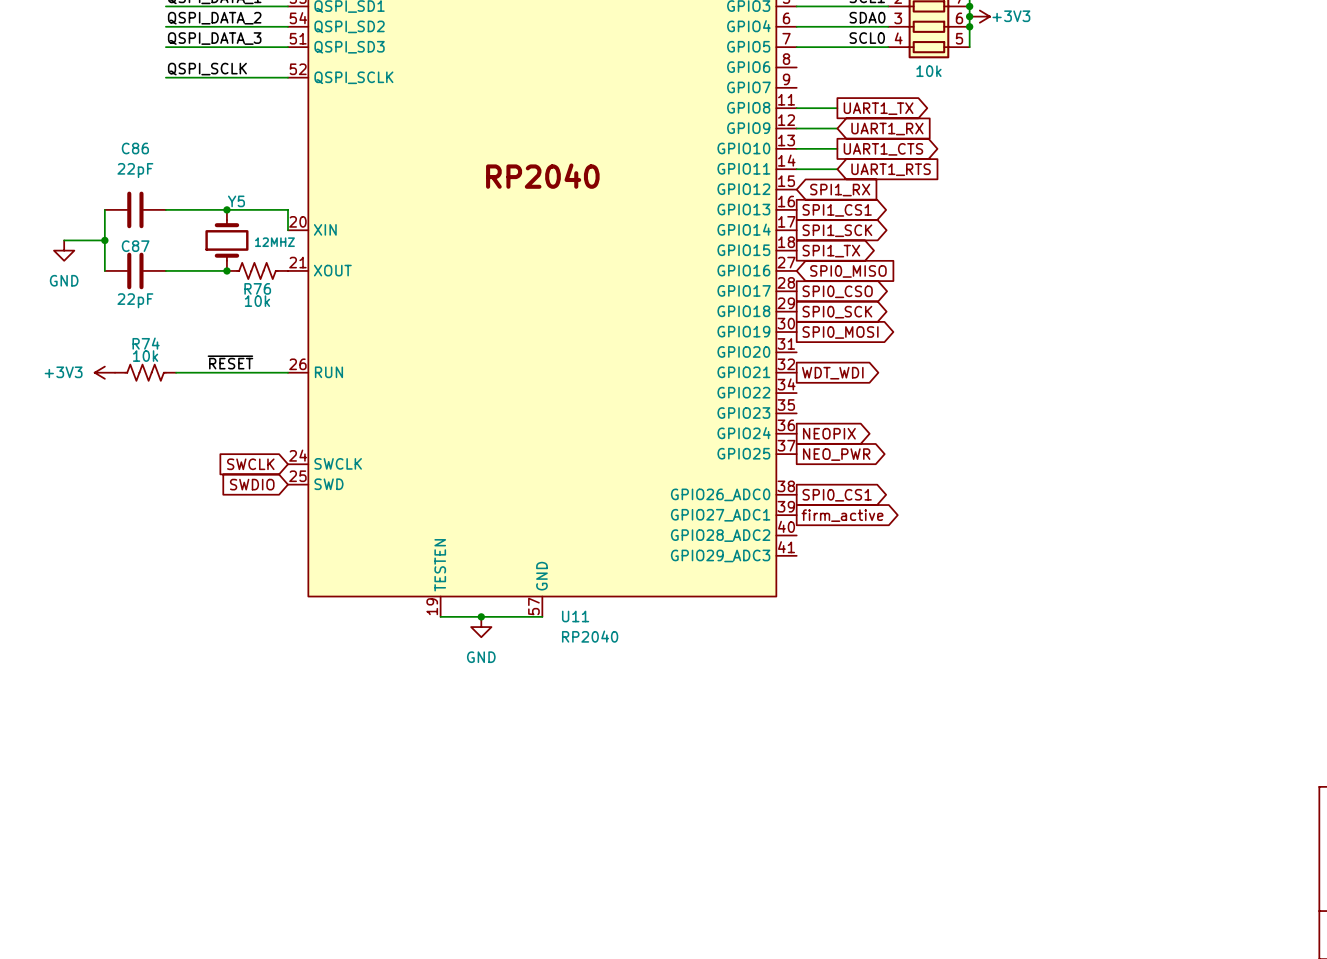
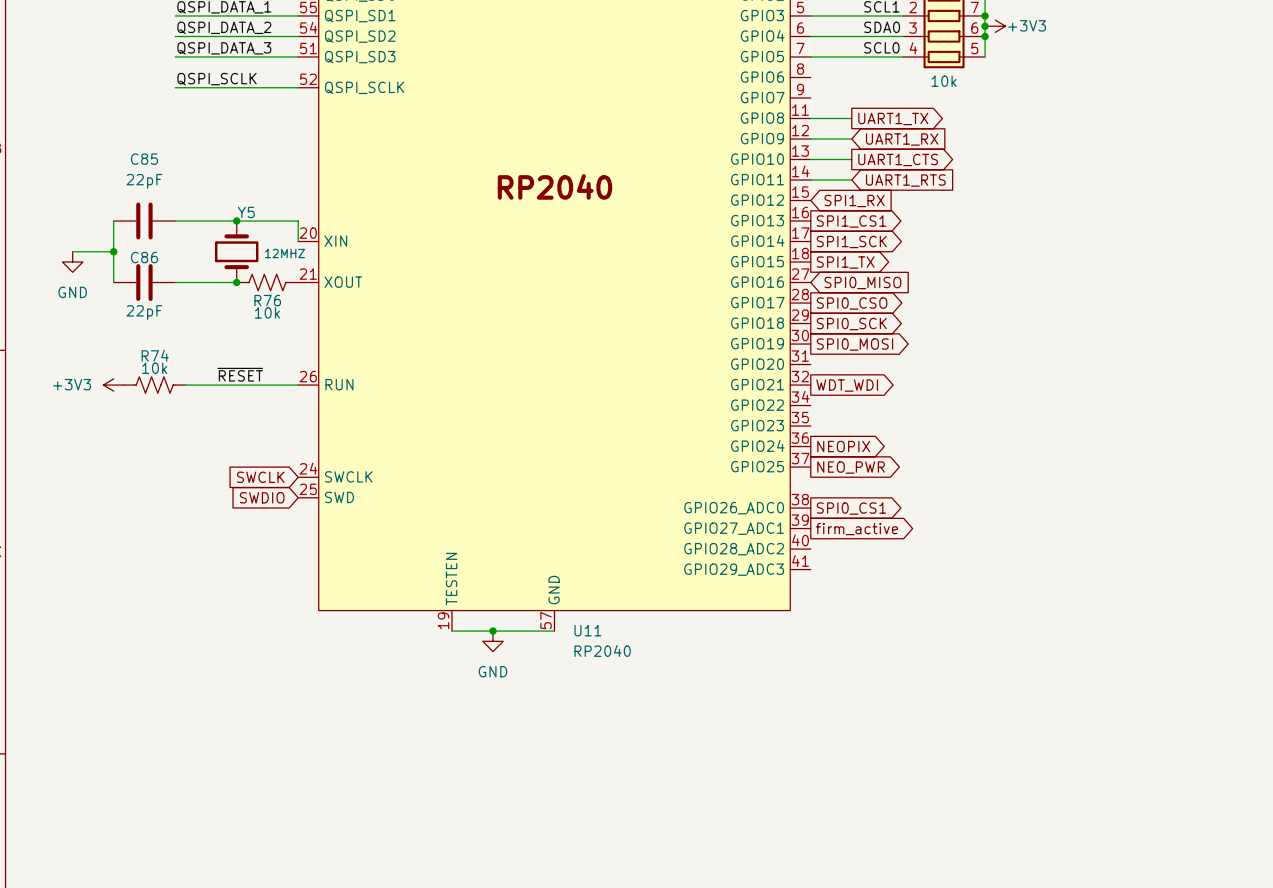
C86 name: C86 (135, 148) -> C85 (144, 159)
C87 name: C87 (135, 246) -> C86 (144, 257)

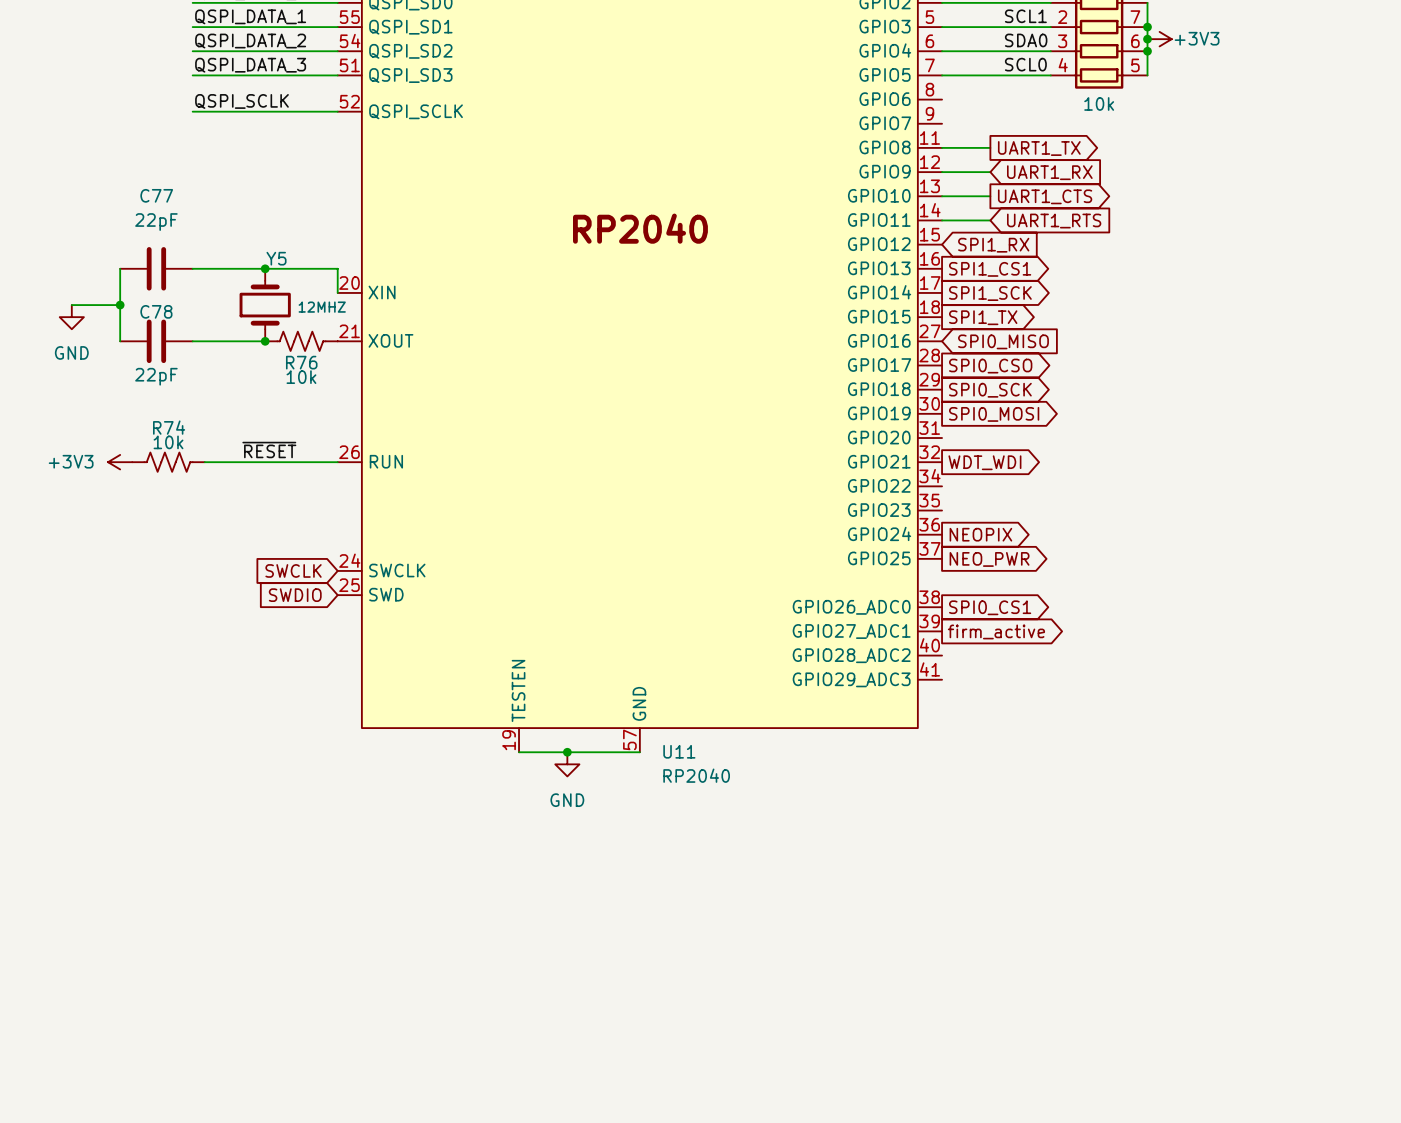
C85 name: C85 (144, 159) -> C77 (156, 195)
C86 name: C86 (144, 257) -> C78 (156, 311)

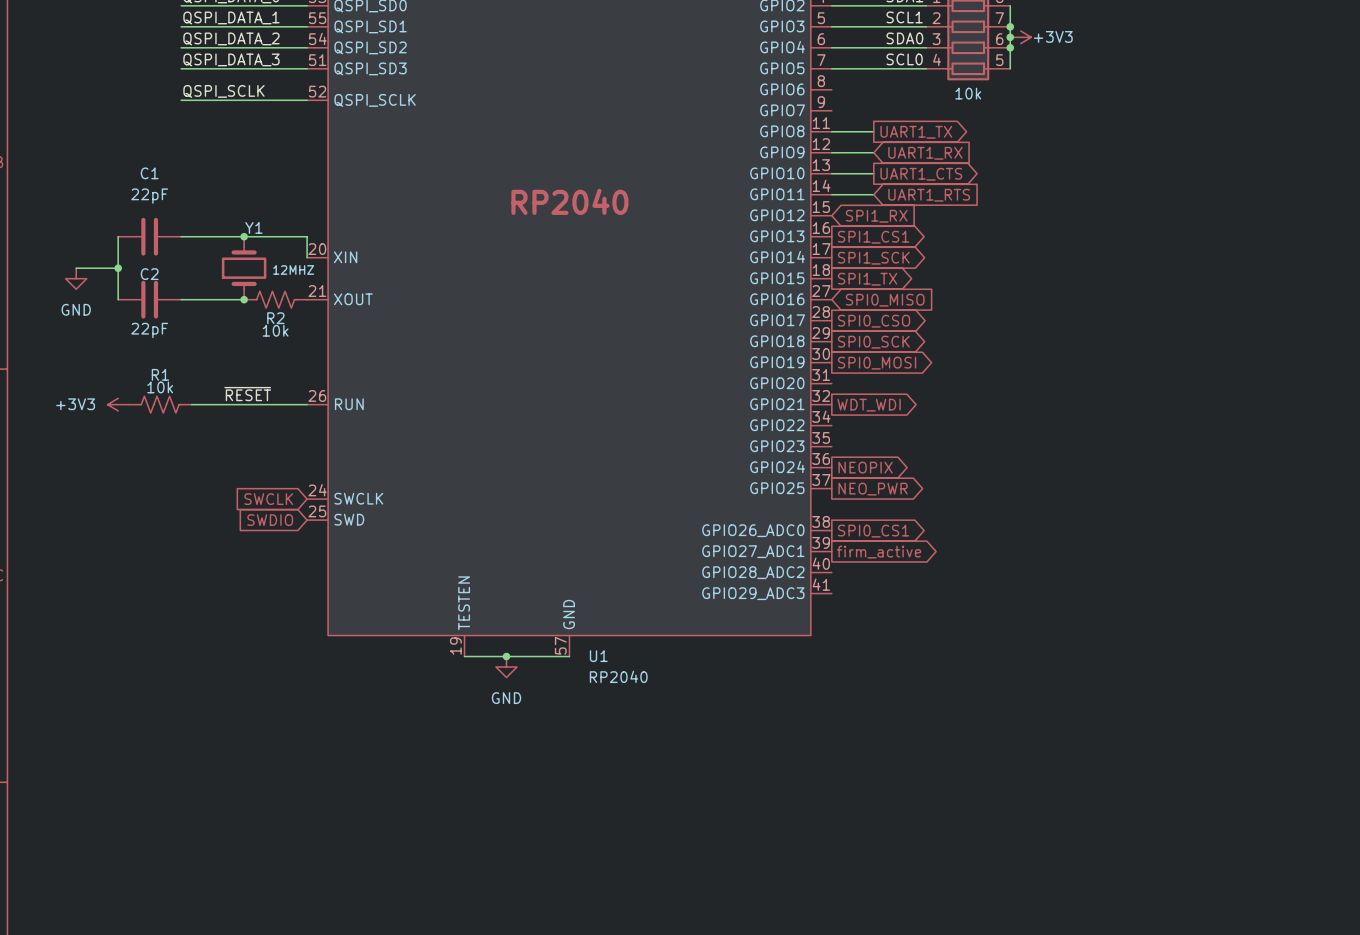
C77 name: C77 (156, 195) -> C1 (149, 173)
Y5 name: Y5 (276, 258) -> Y1 (253, 227)
C78 name: C78 (156, 311) -> C2 (149, 274)
R76 name: R76 (301, 362) -> R2 (275, 318)
R74 name: R74 (169, 427) -> R1 (160, 374)
U11 name: U11 (679, 751) -> U1 (598, 656)

